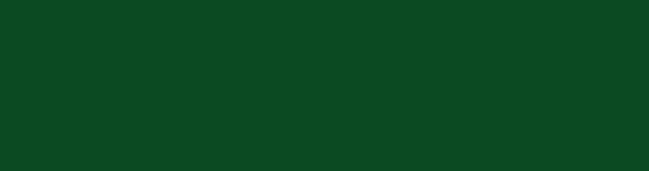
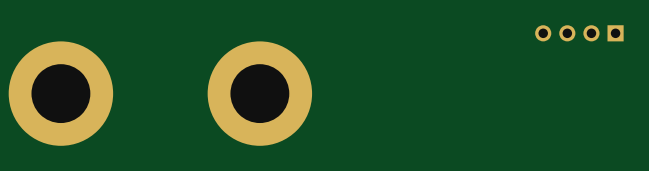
part: none -> (579, 33)
part: none -> (60, 93)
part: none -> (259, 93)

